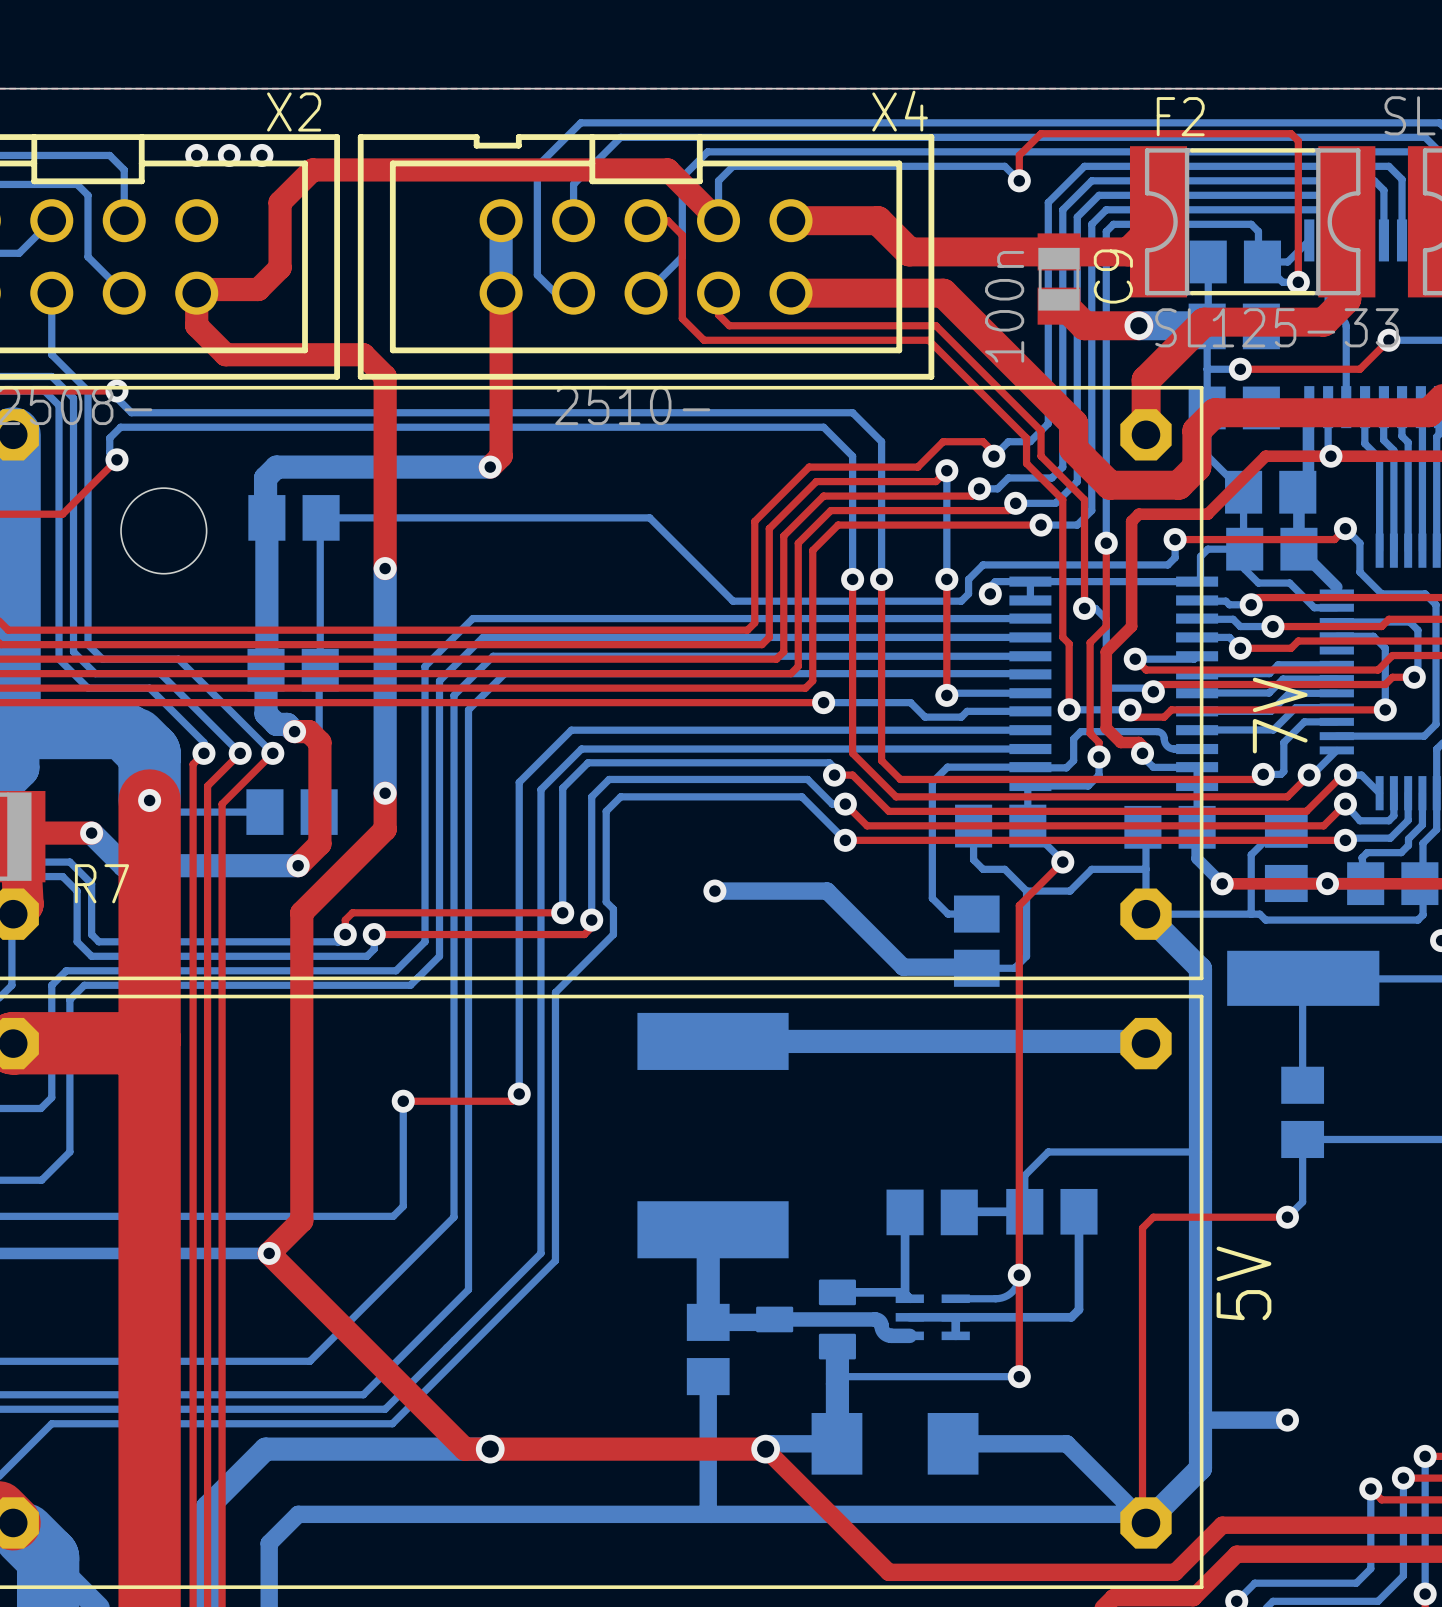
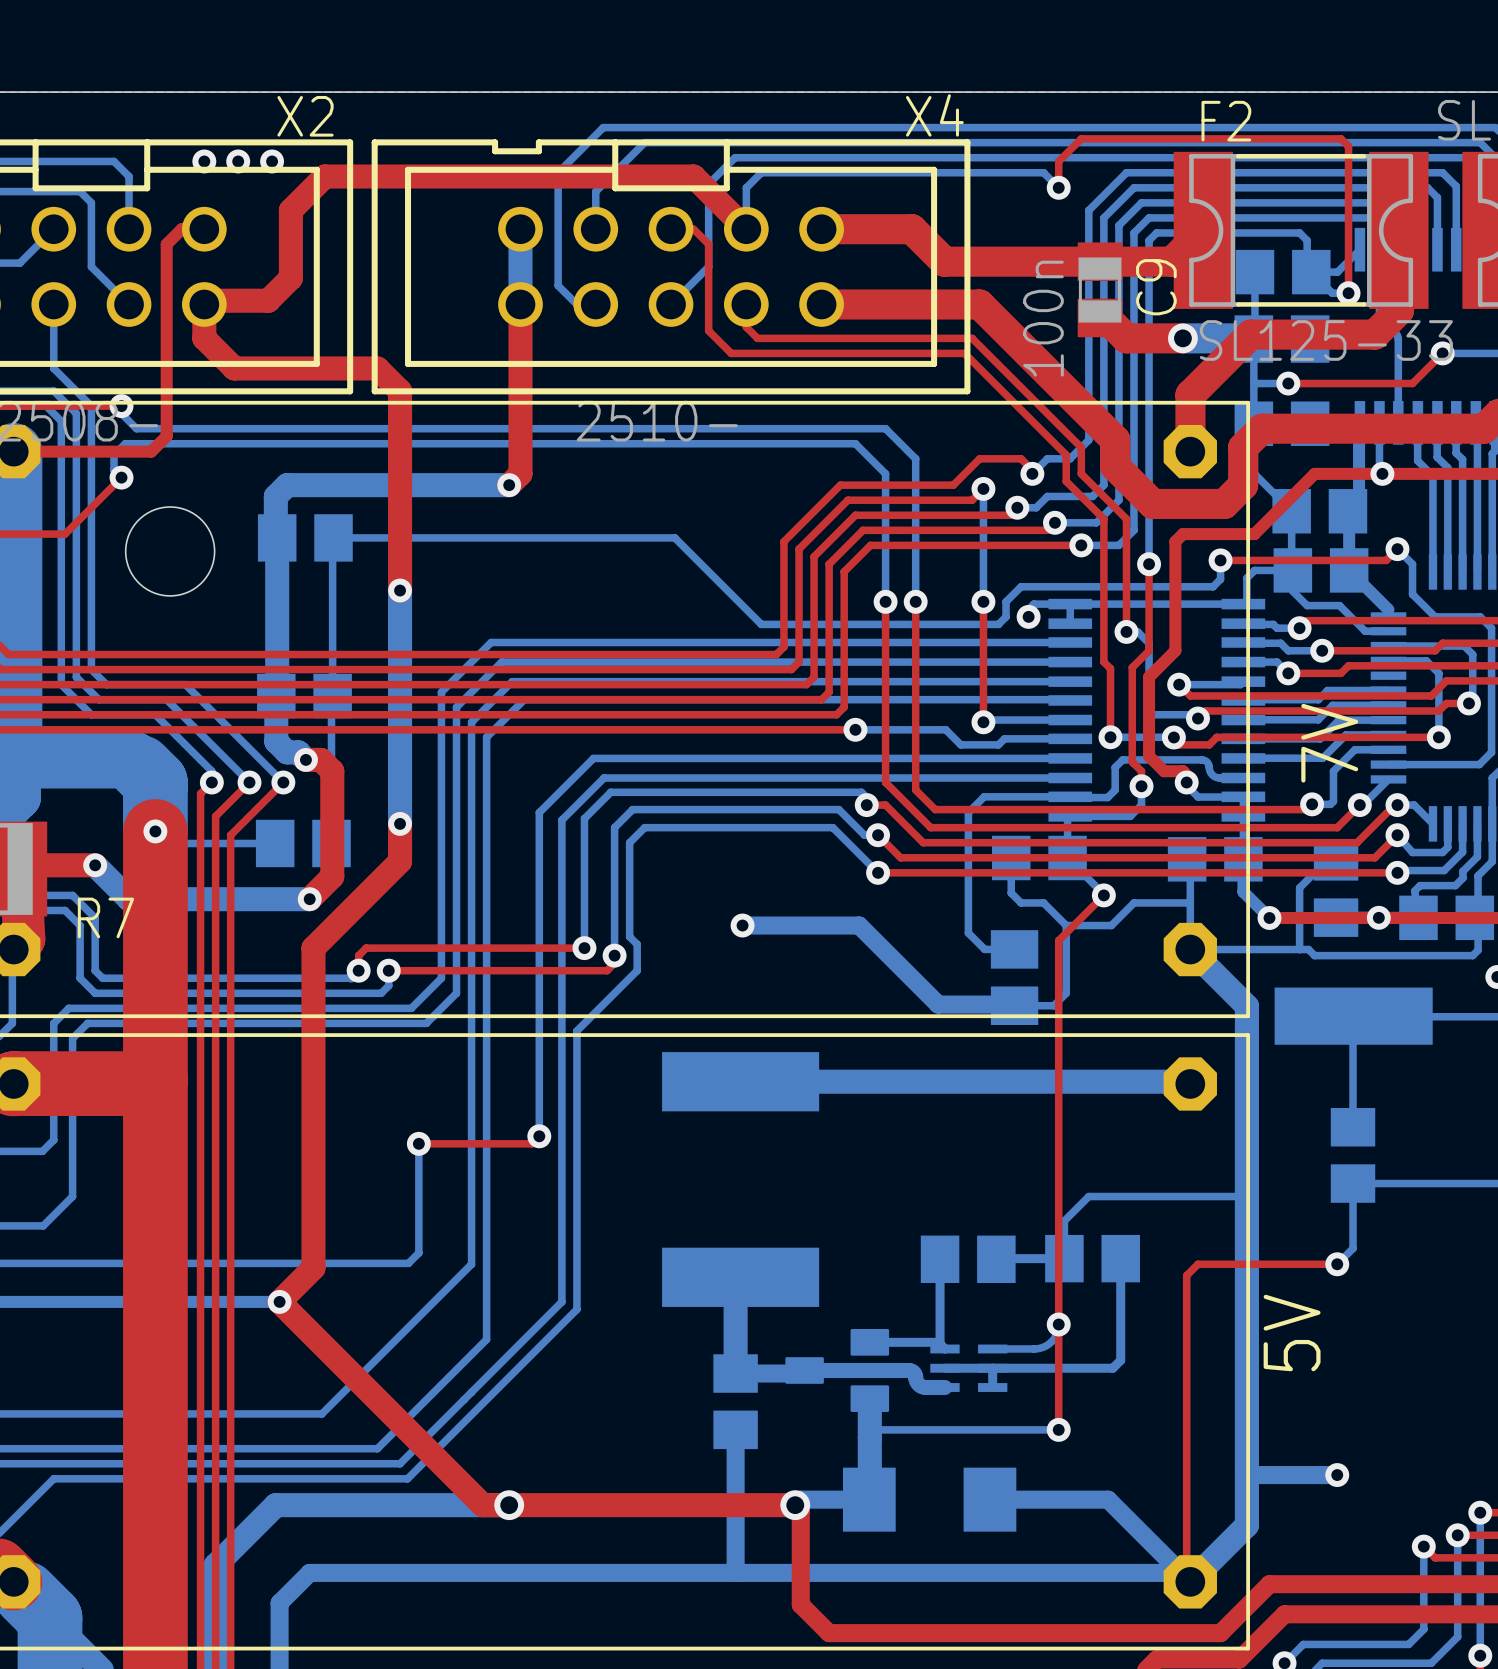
top track: none -> (204, 229) (181, 229) (166, 244) (166, 436) (151, 451) (13, 451)
top track: (770, 1454) (888, 1572) -> (800, 1510) (800, 1604) (829, 1633) (923, 1633)

